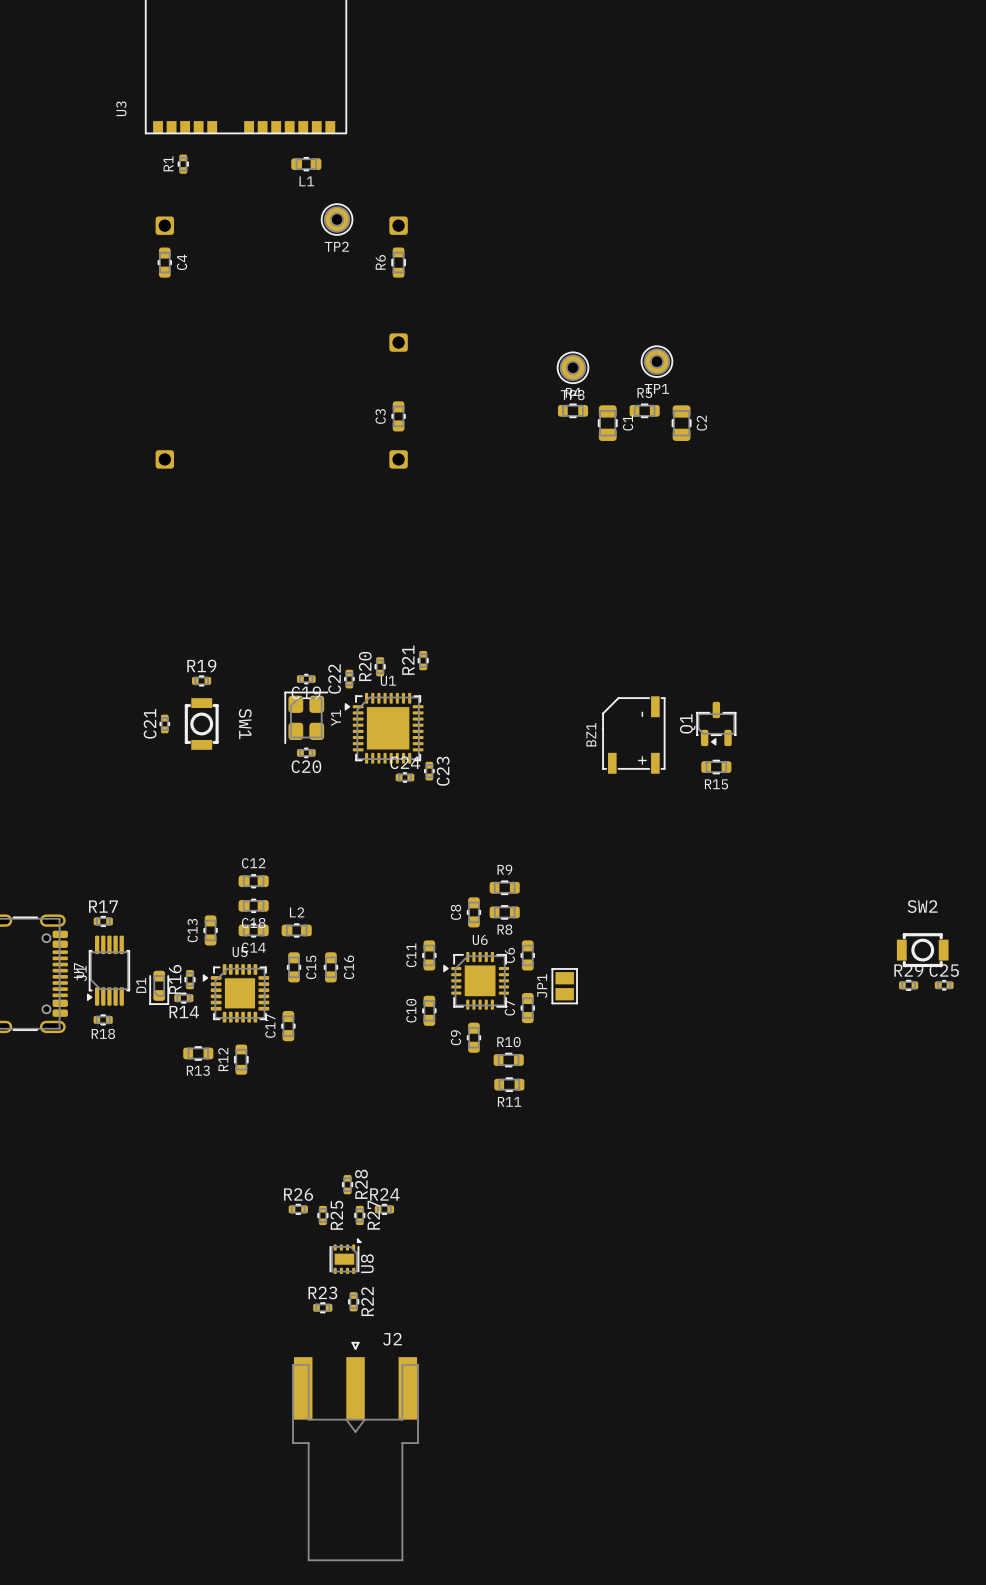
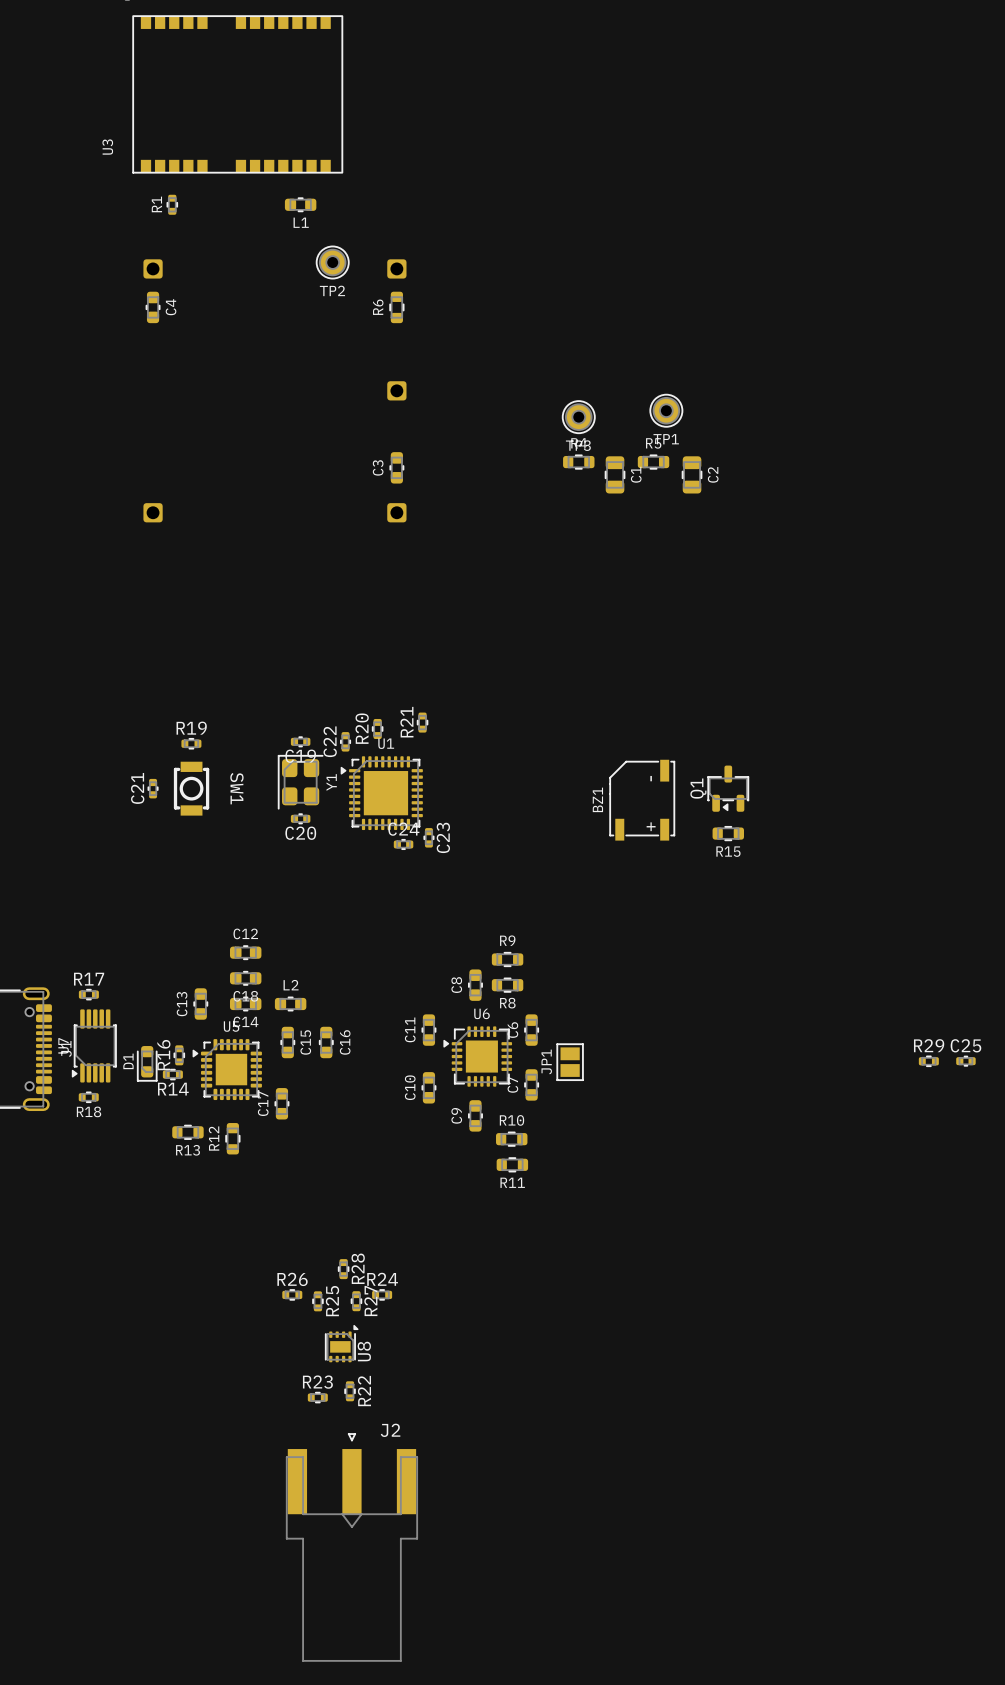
SW2: (922, 950) -> none

